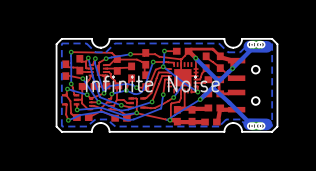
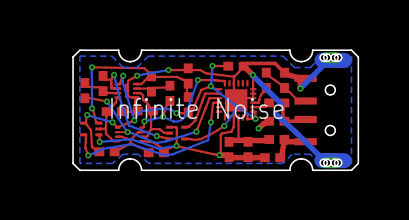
bottom track: (232, 68) (200, 99) (166, 120) -> none

